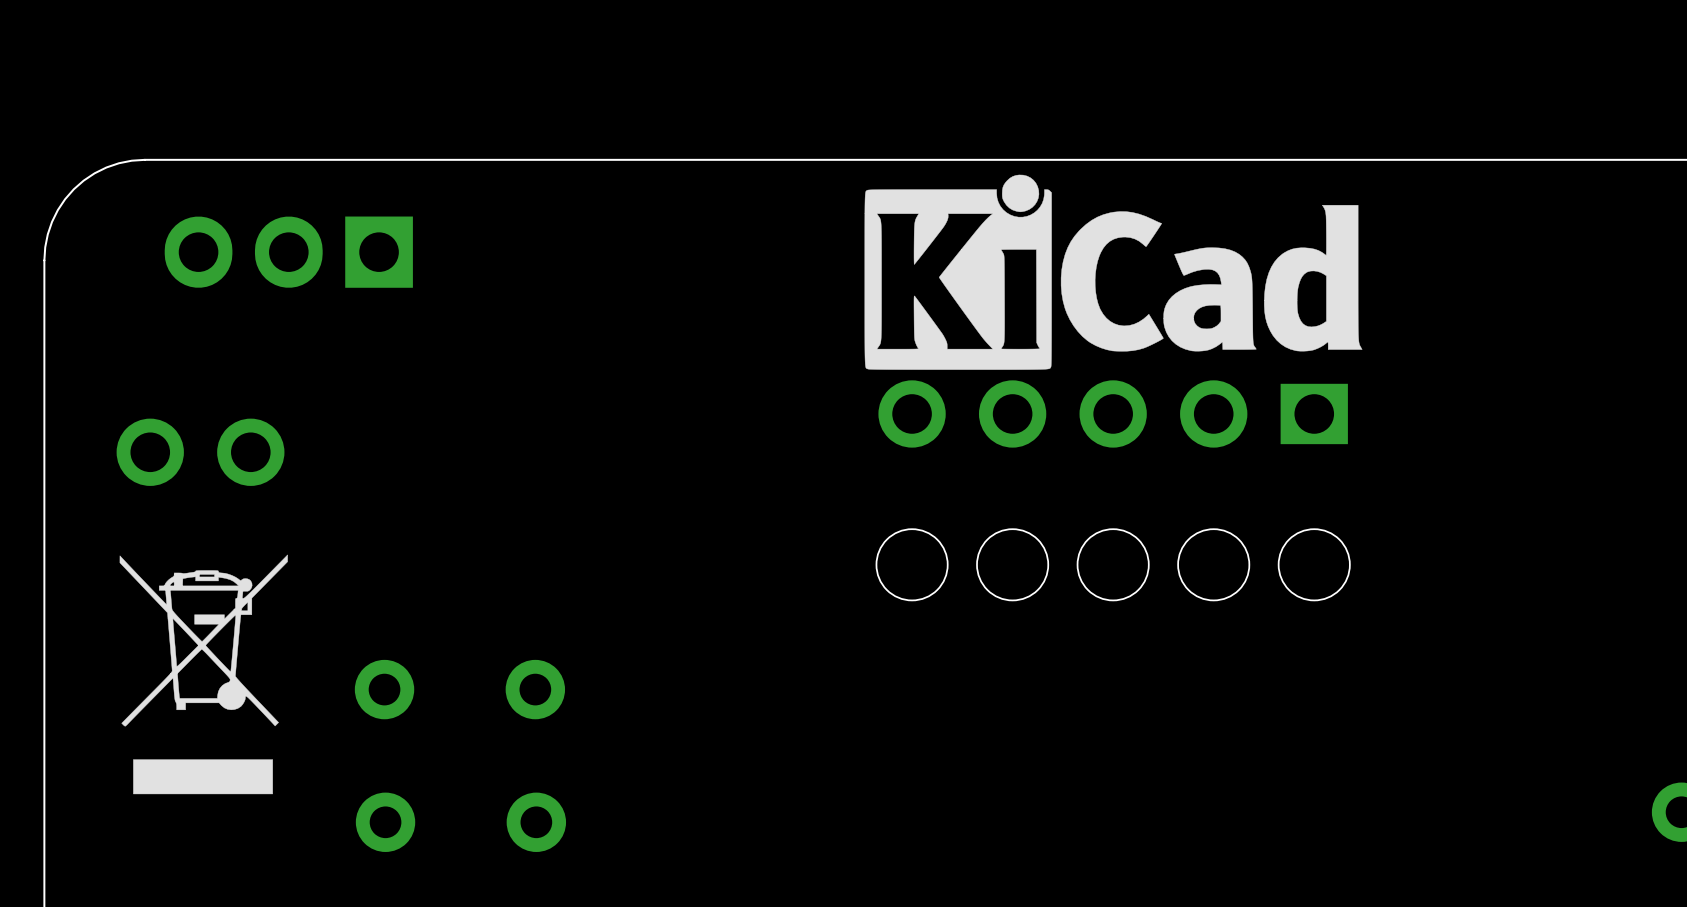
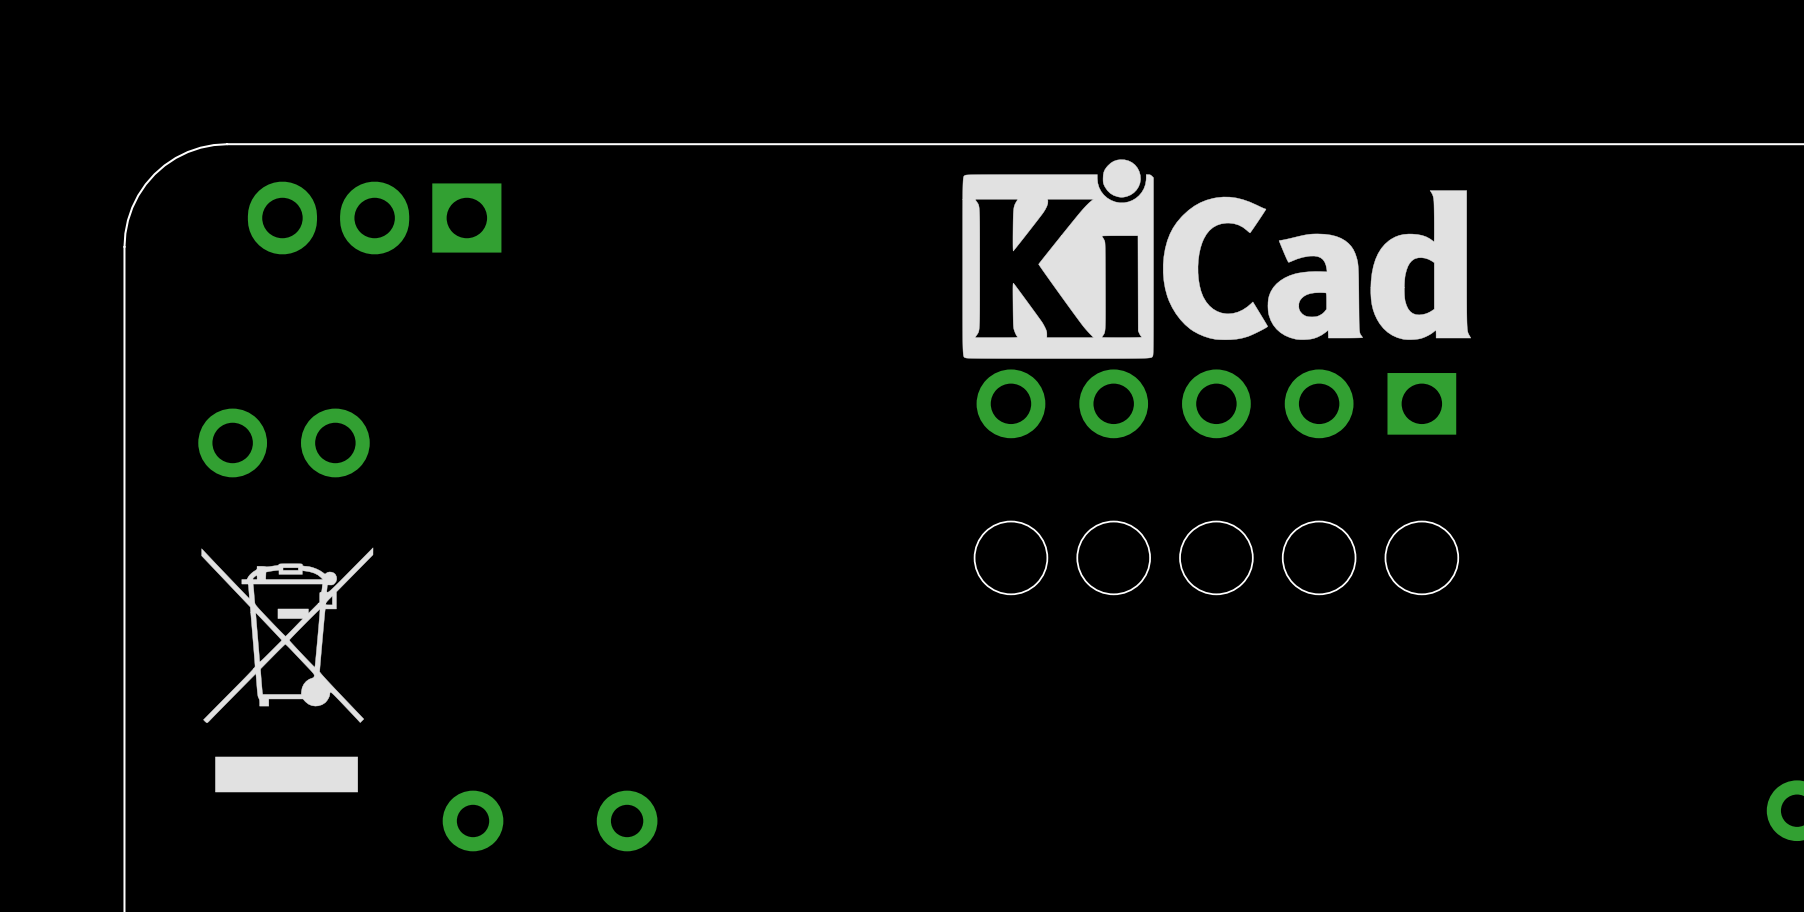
part footprint: [164, 216, 413, 288] -> [247, 181, 502, 255]
part: (459, 689) -> none

